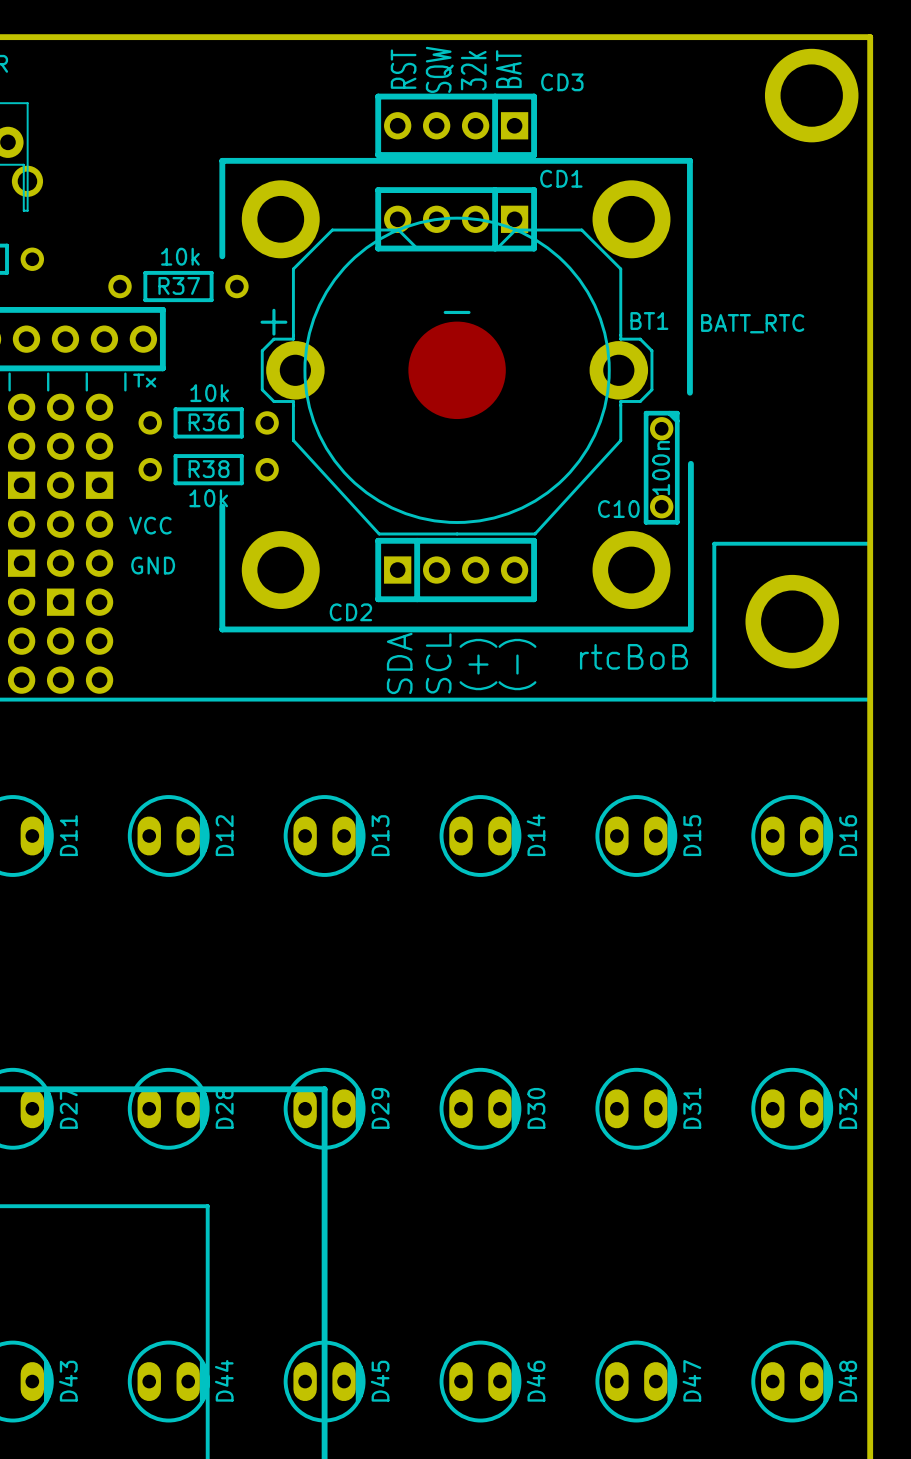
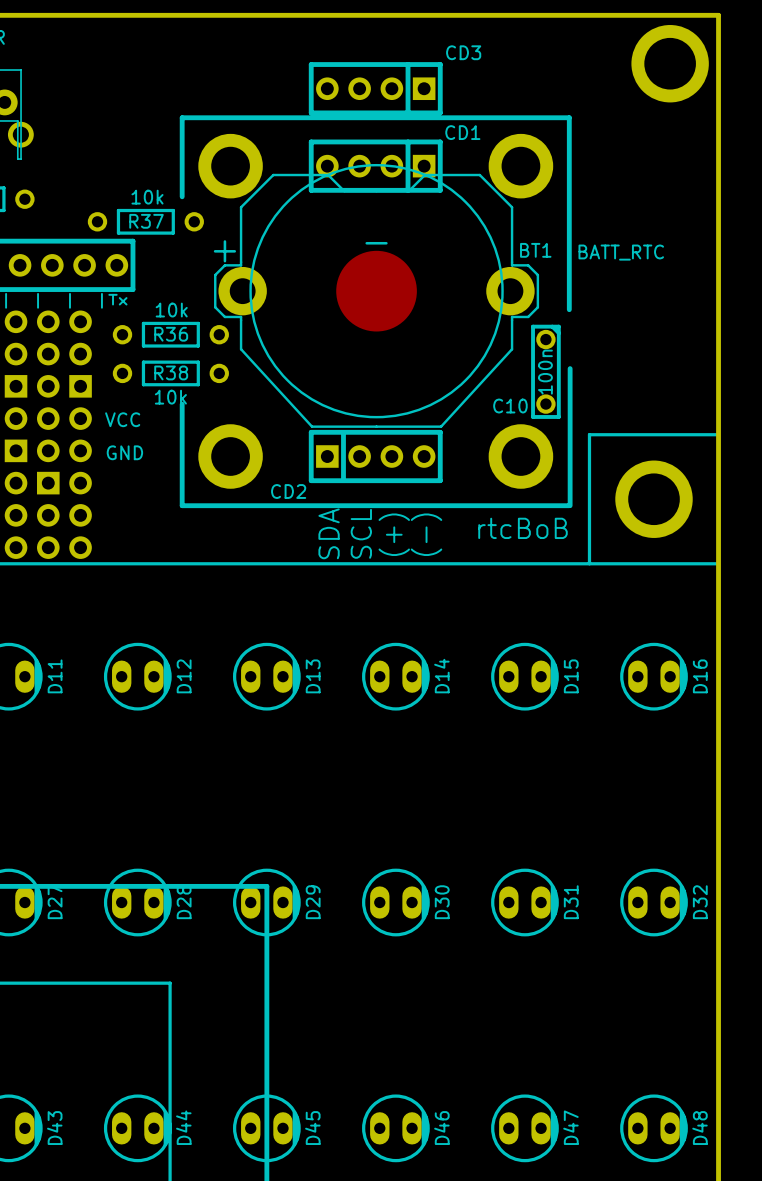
text: RST (403, 69) -> none
text: SQW (439, 69) -> none
text: BAT (508, 69) -> none
text: 32k (473, 70) -> none

